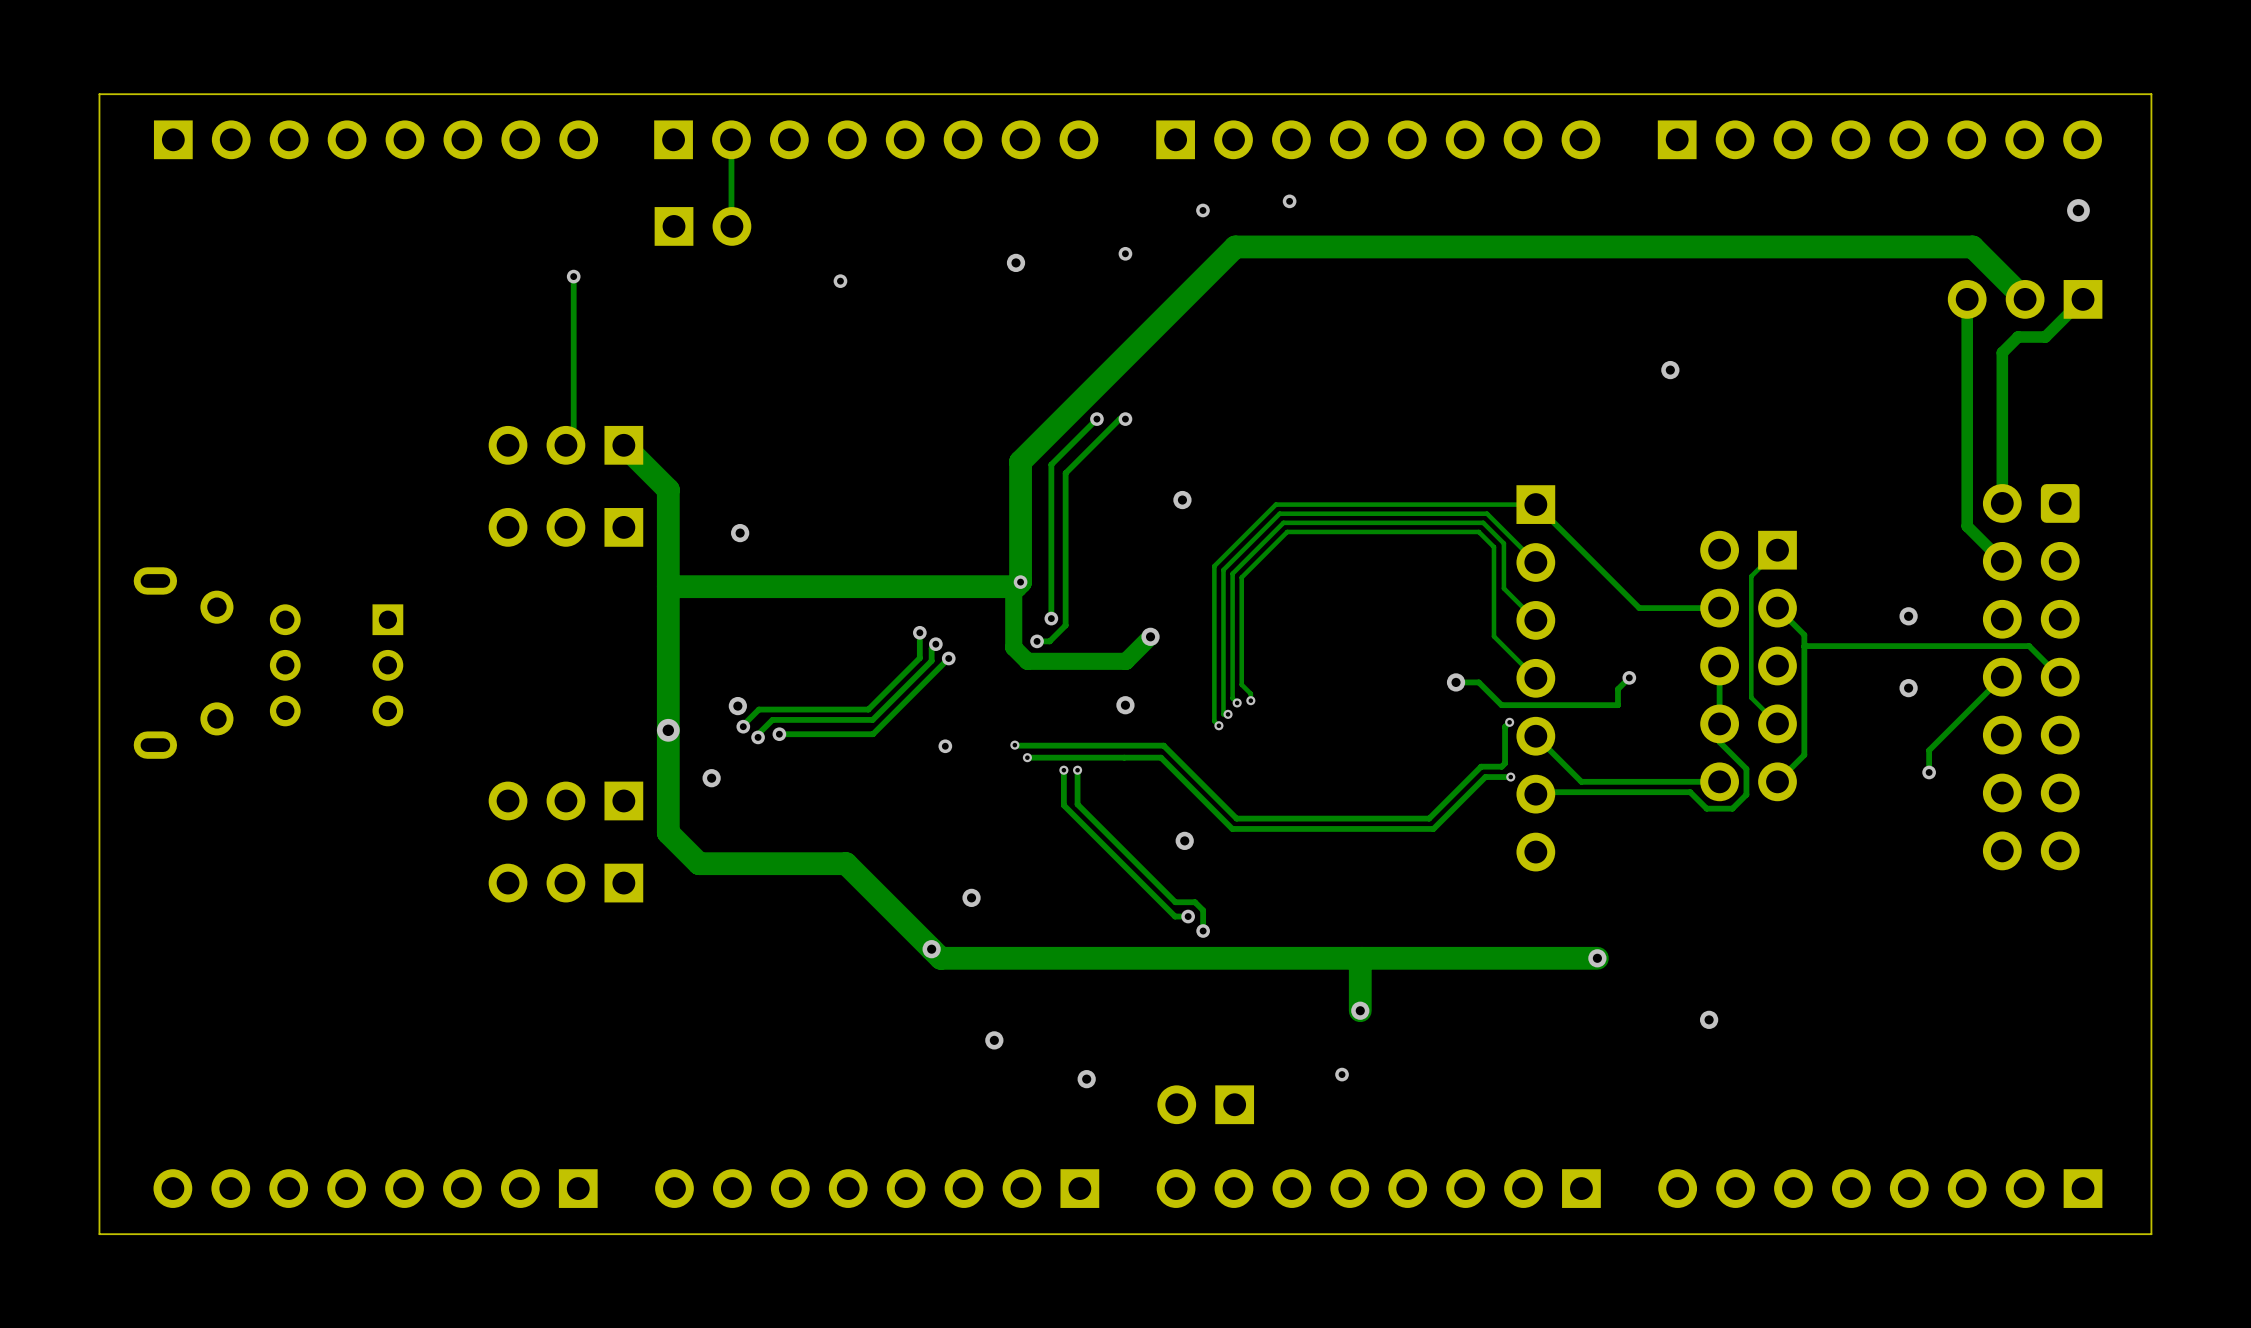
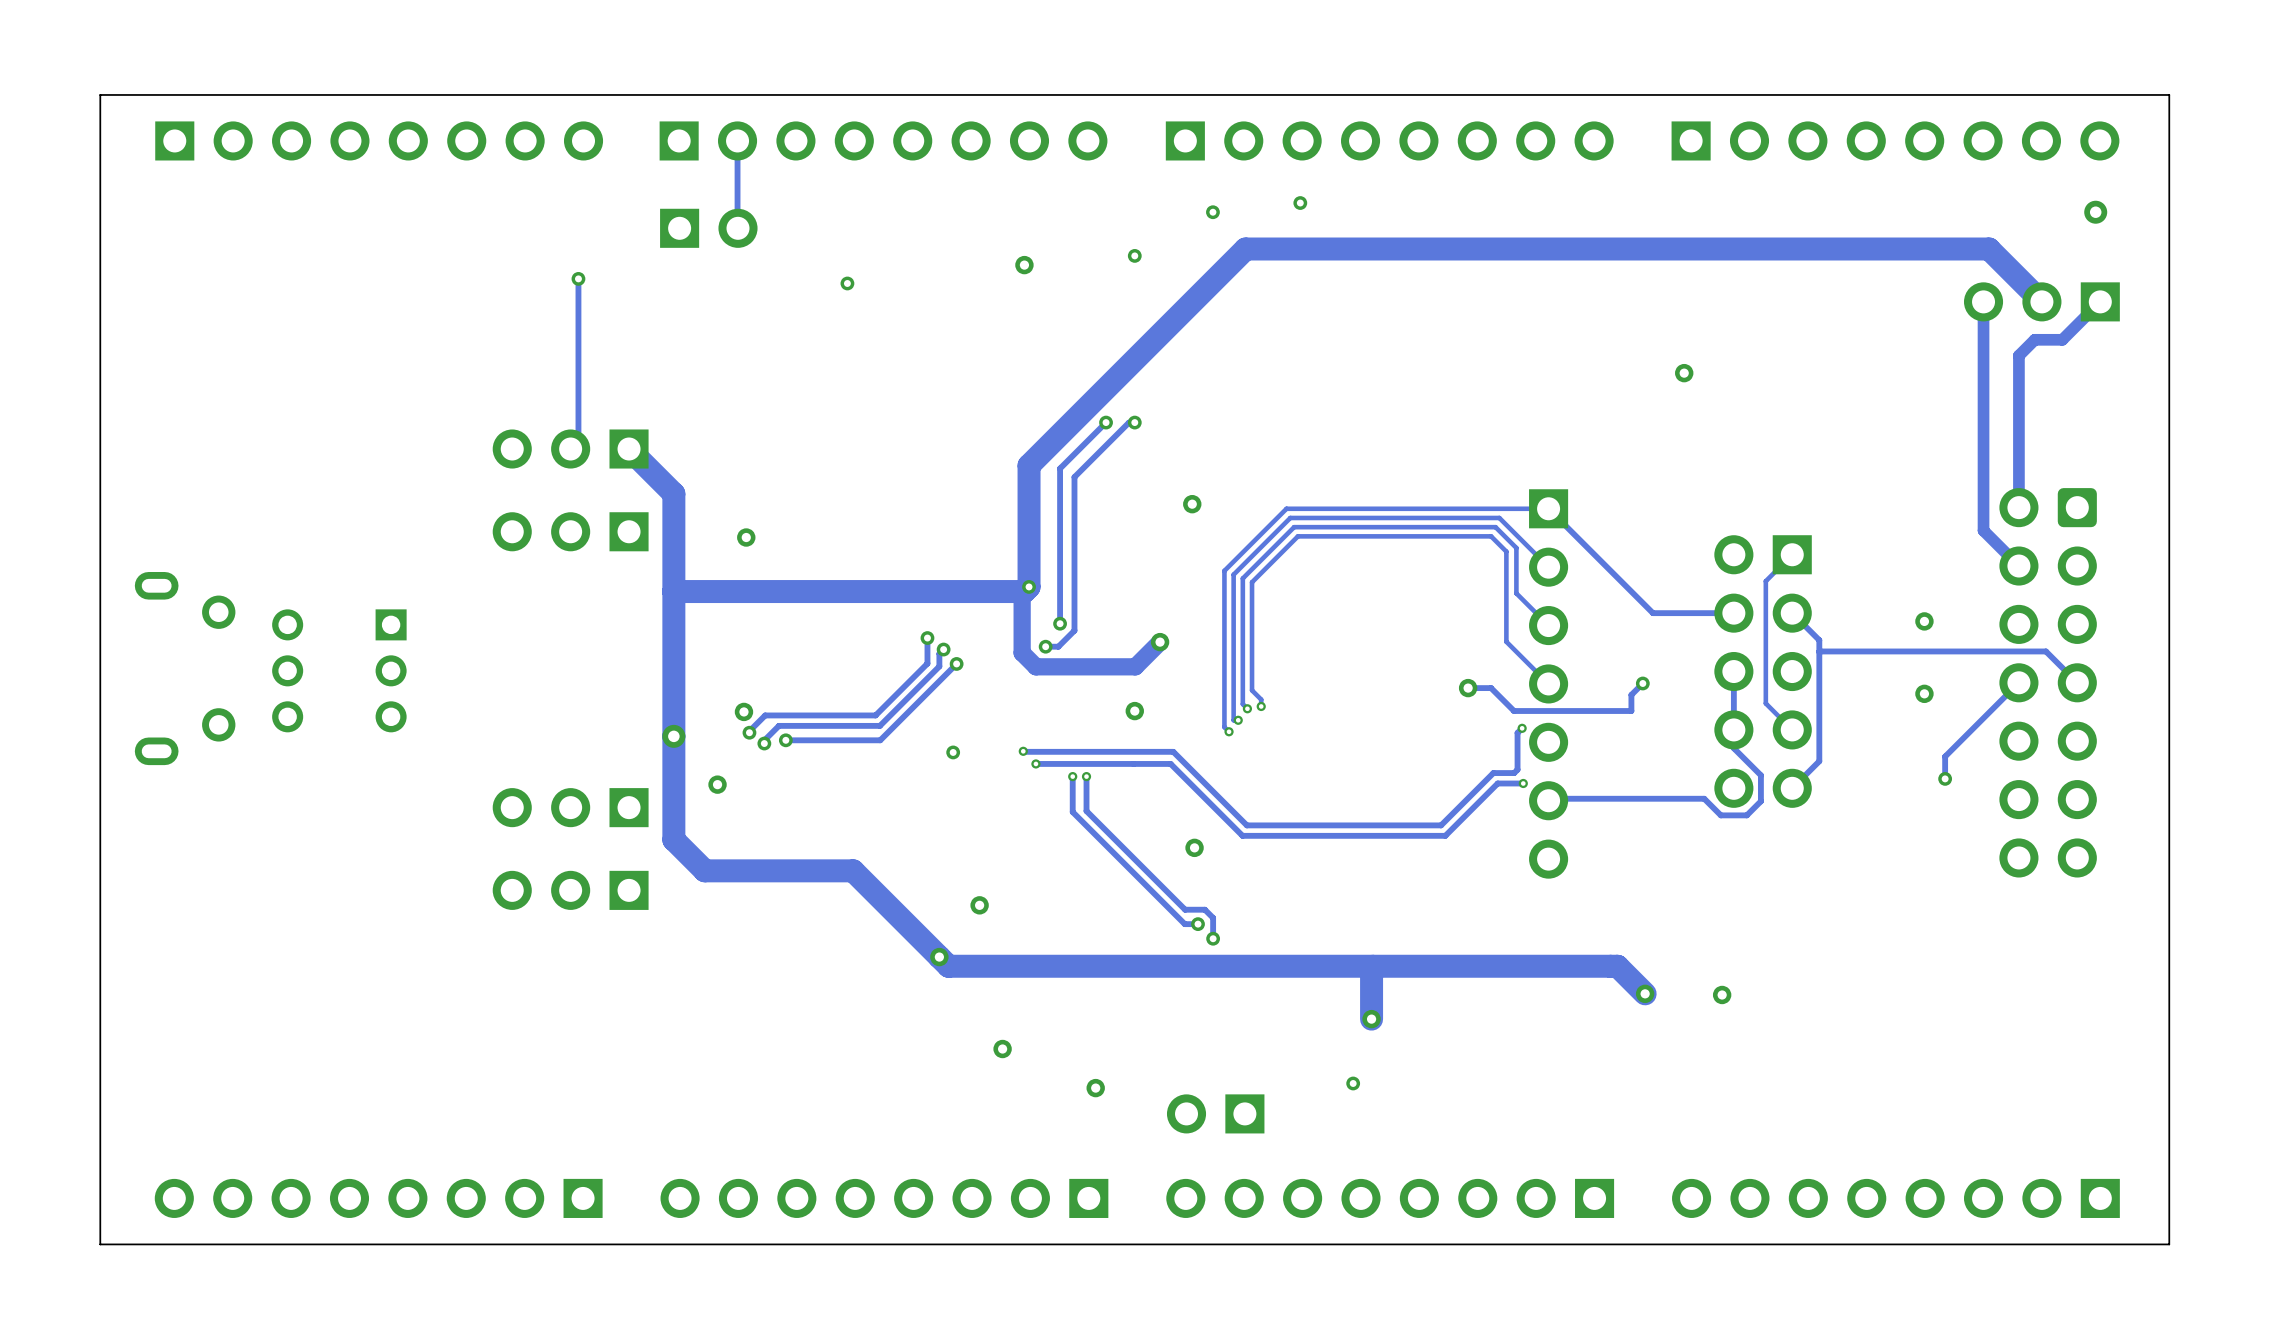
track: (1535, 736) (1581, 781) (1719, 781) -> none
track: none -> (1610, 966) (1617, 966) (1645, 993)
via: (1597, 958) -> none
via: none -> (1645, 993)
via position: (1709, 1019) -> (1722, 994)

